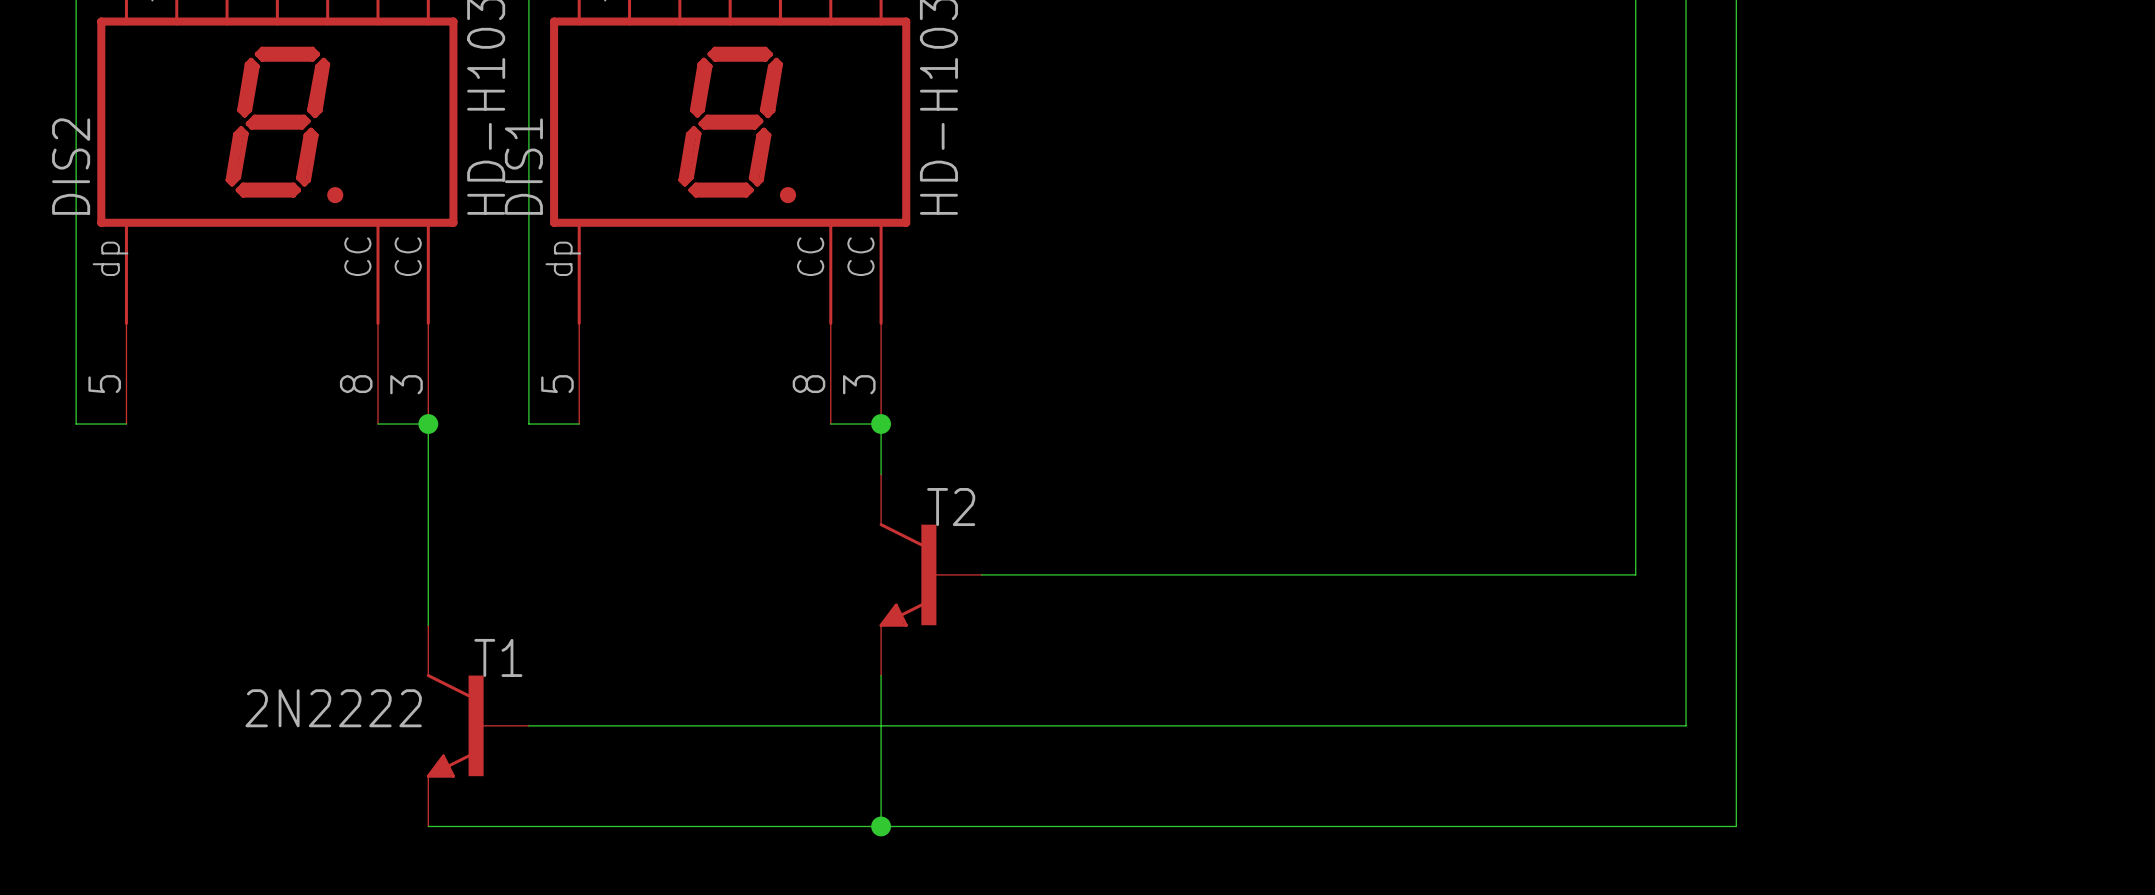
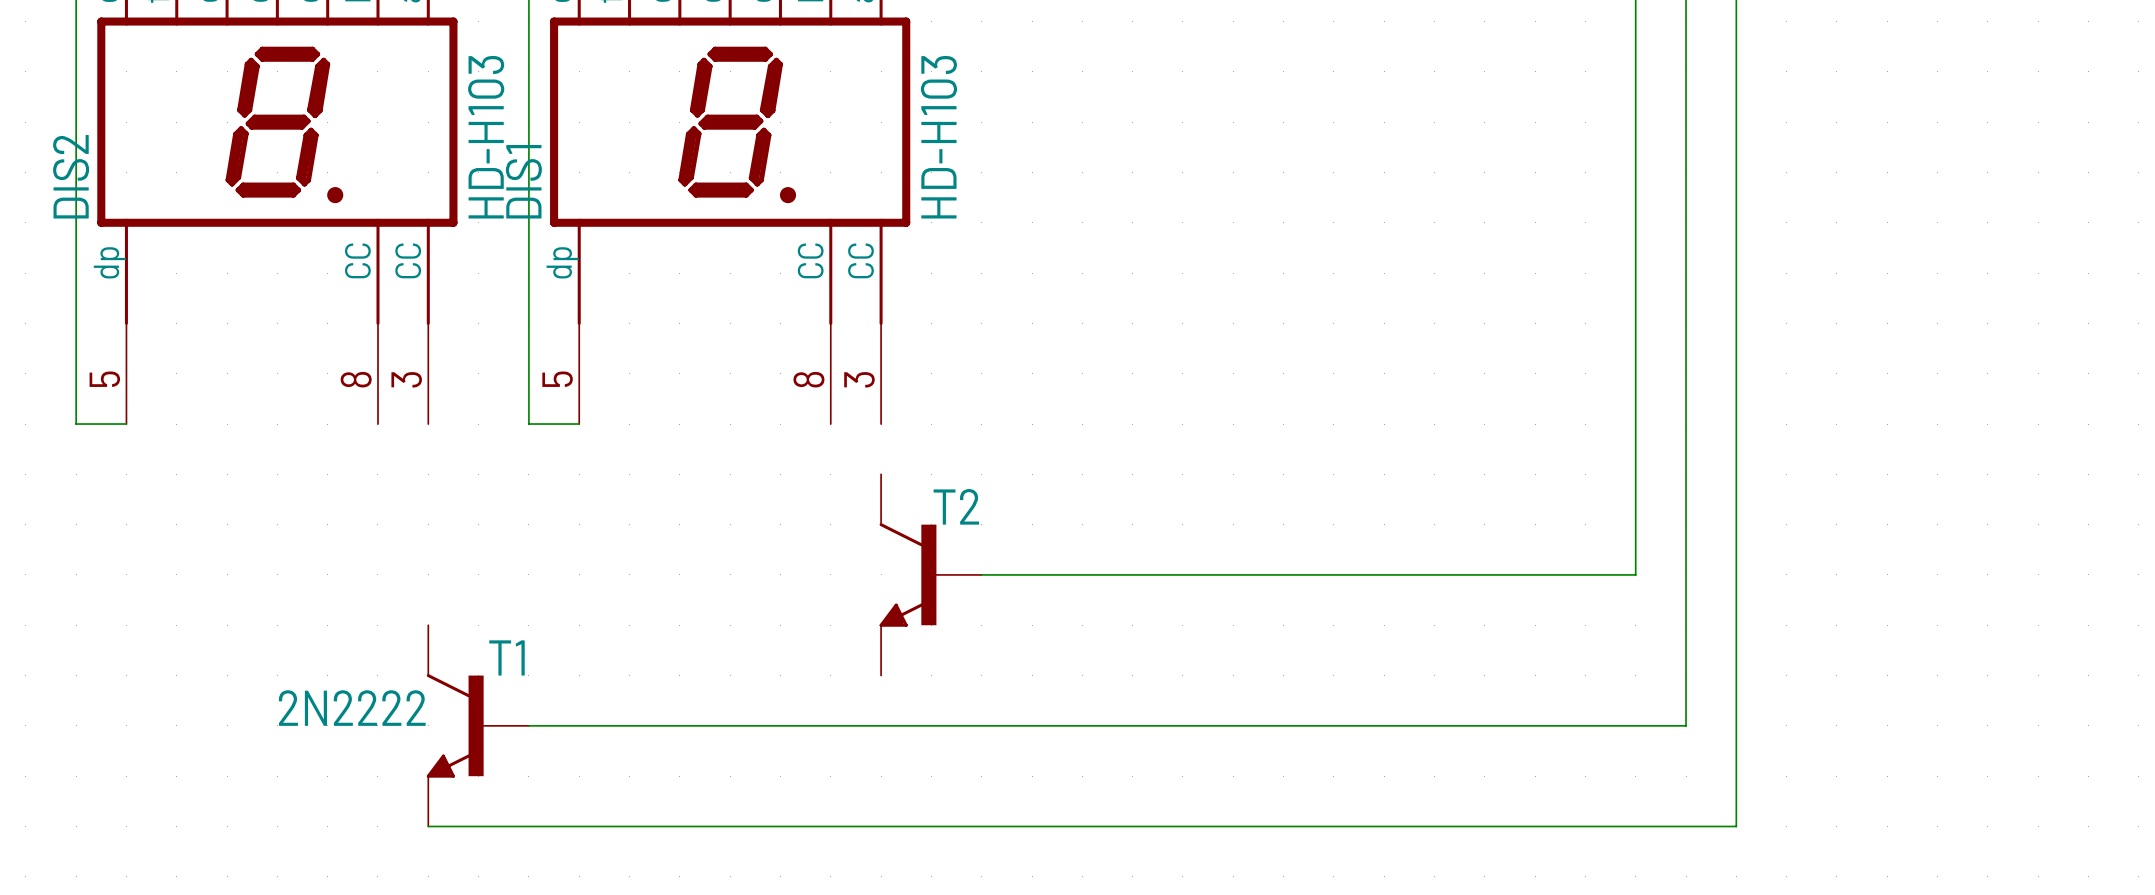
wire: (377, 424) (428, 424) (428, 625) -> none
junction: (428, 424) -> none
wire: (830, 424) (881, 424) (881, 474) -> none
junction: (881, 424) -> none
wire: (881, 675) (881, 826) -> none
junction: (881, 826) -> none

